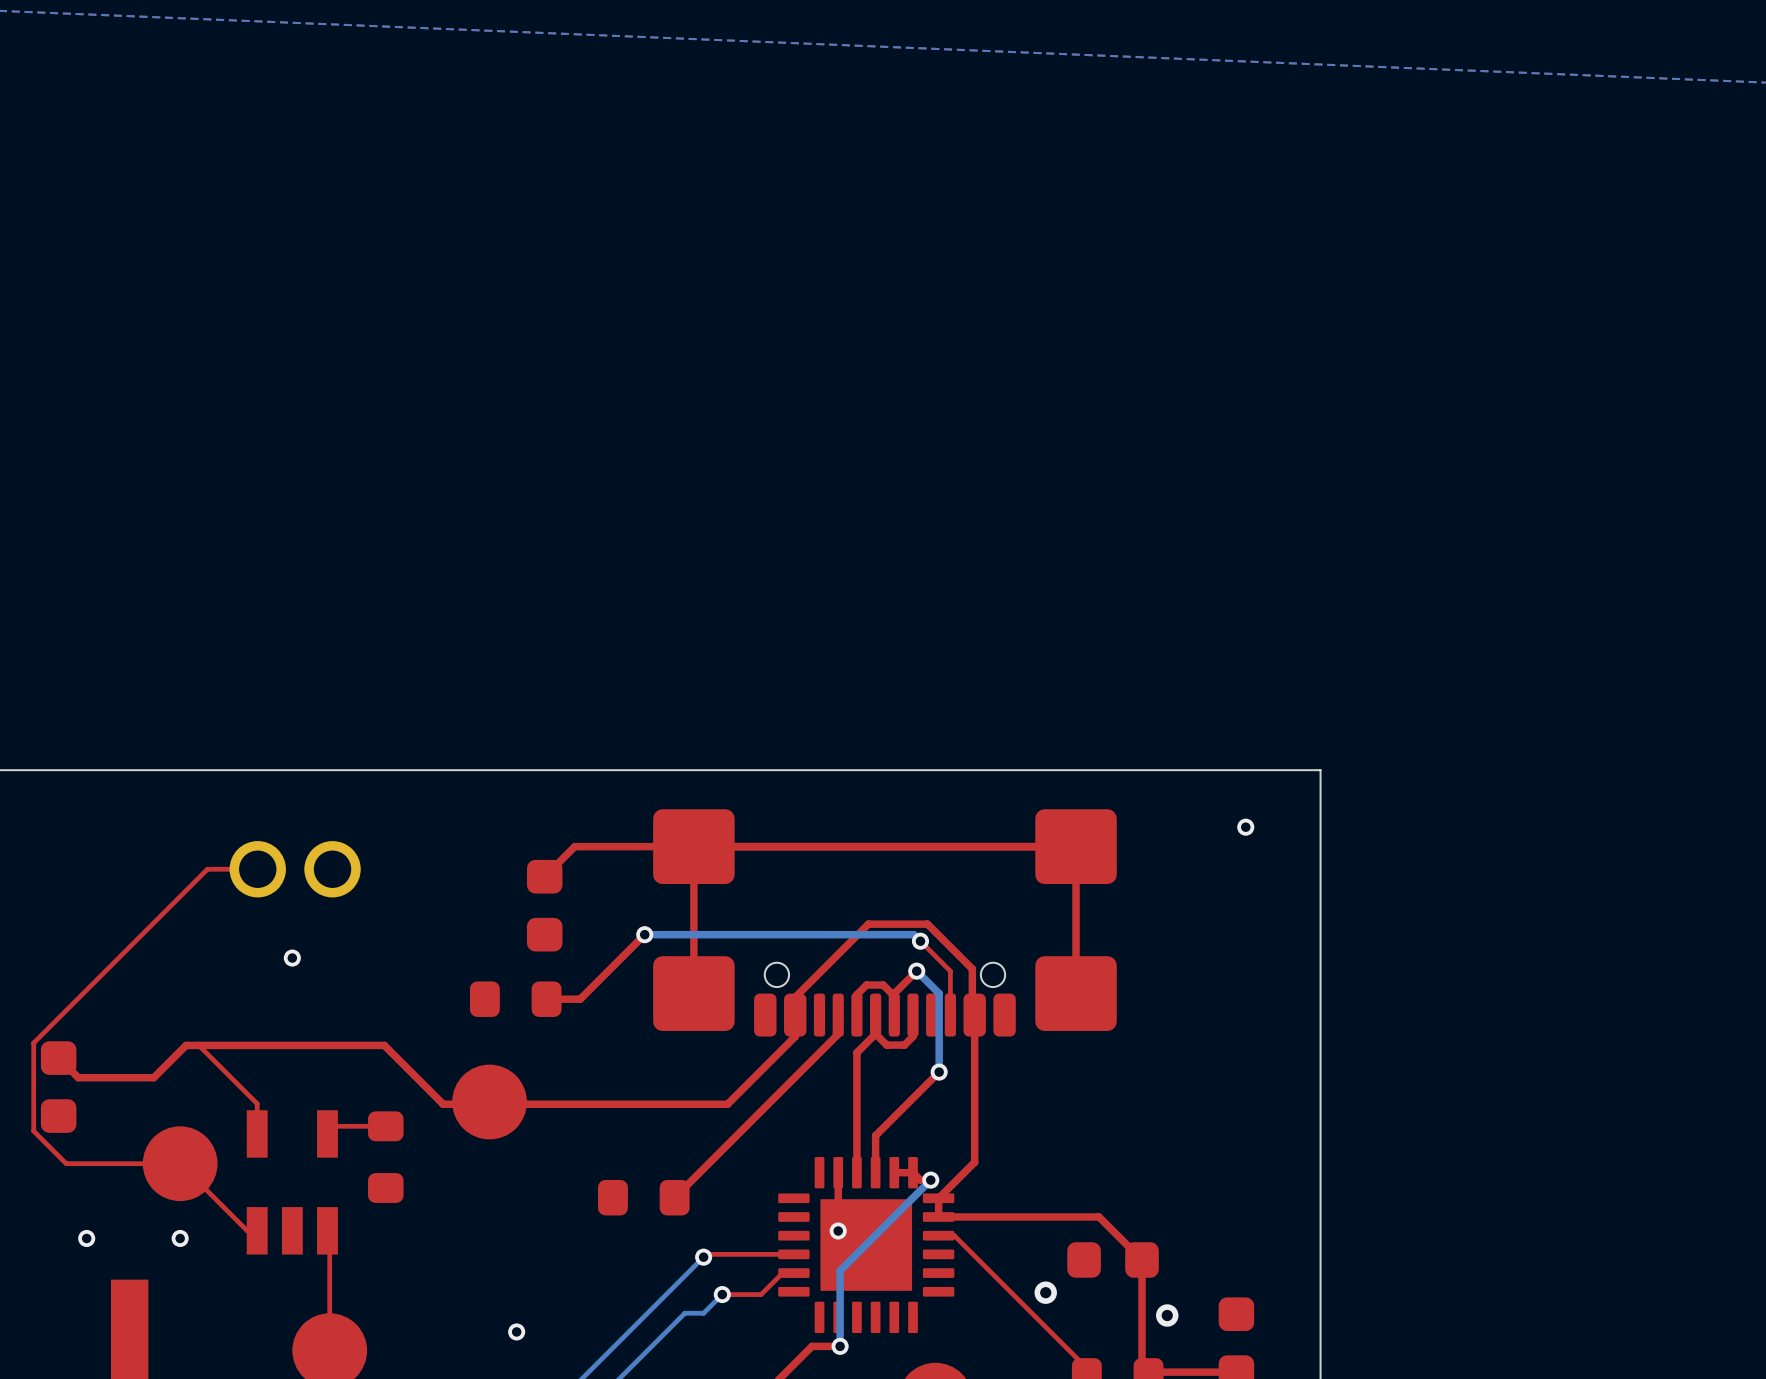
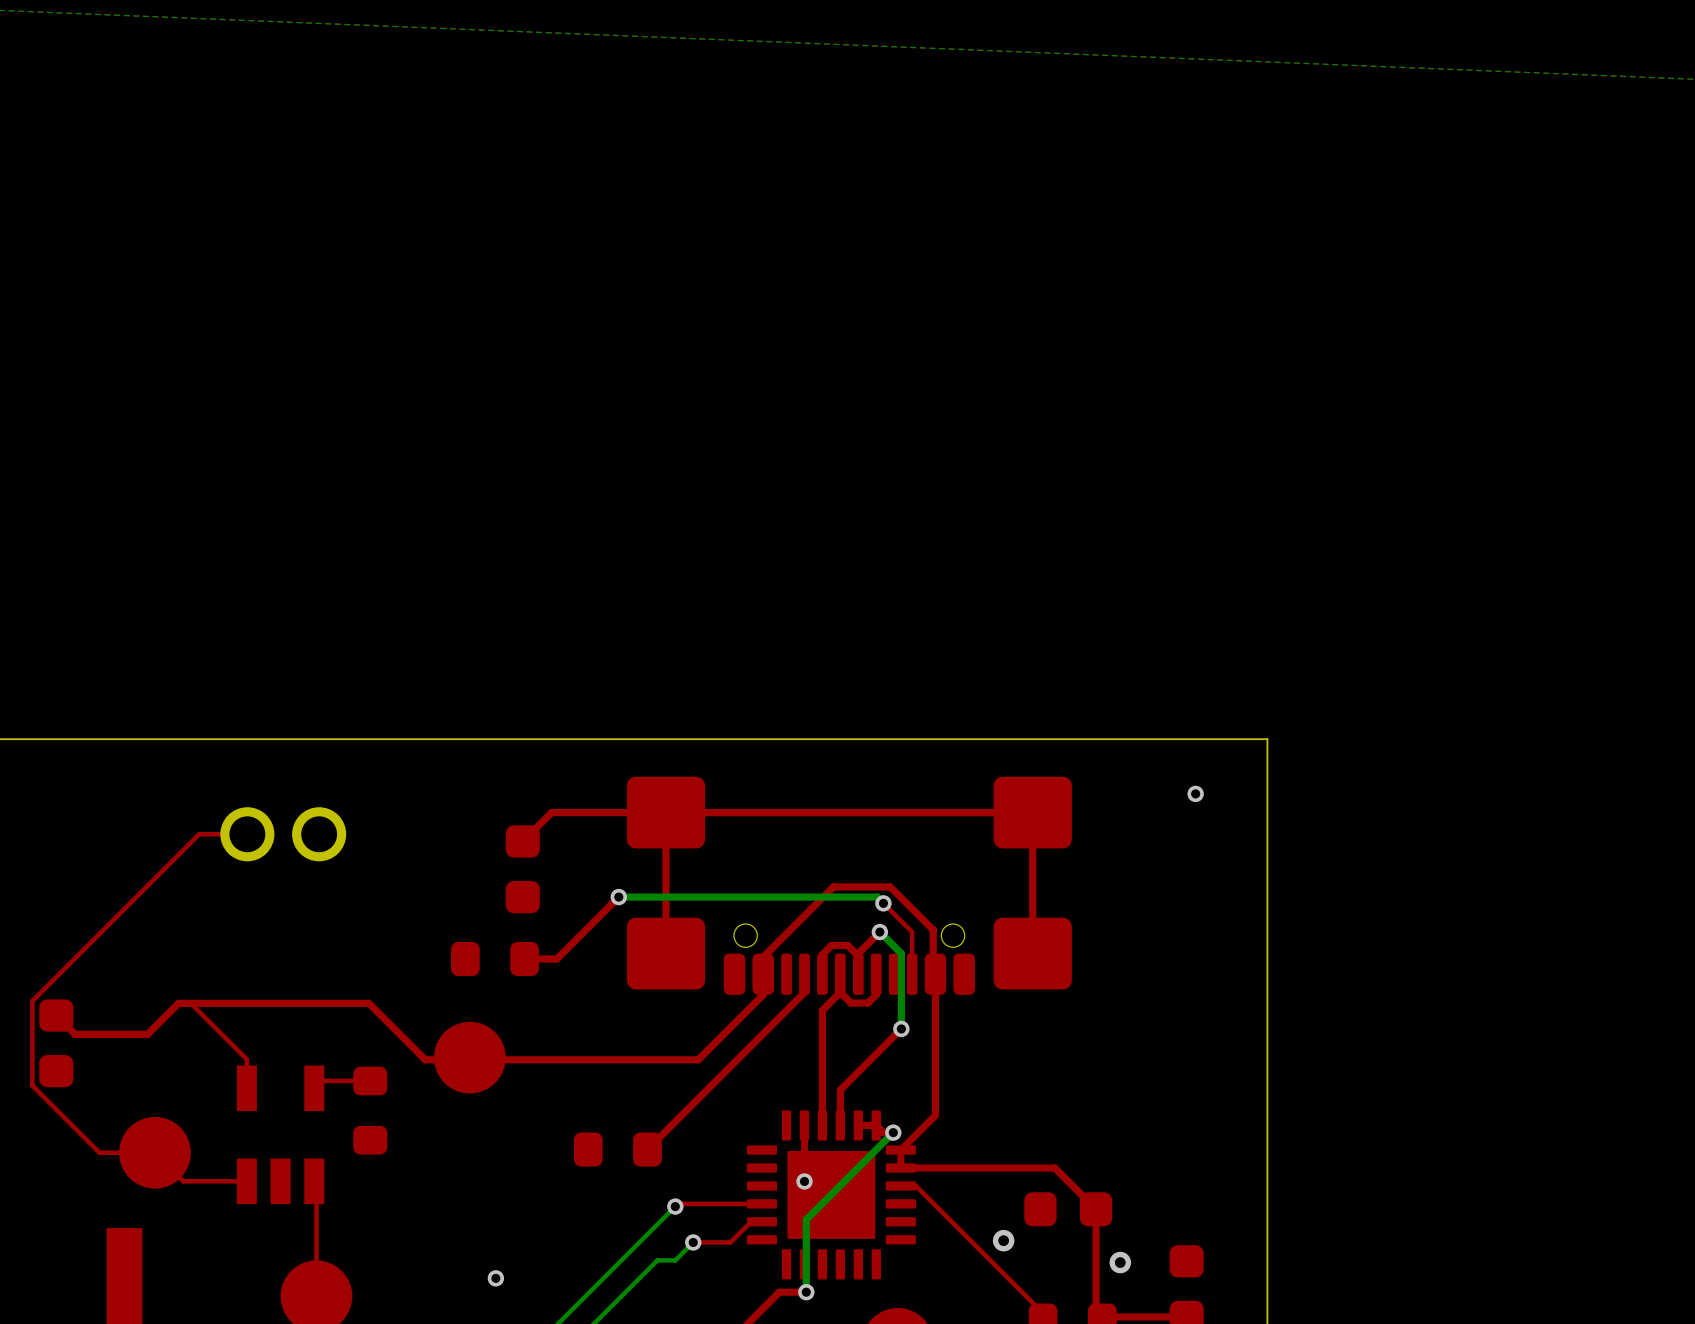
via: (292, 958) -> none
top track: (66, 1163) (180, 1163) (247, 1230) -> (63, 1116) (99, 1152) (154, 1152) (183, 1181) (237, 1181)
part position: (180, 1163) -> (154, 1152)
via: (86, 1238) -> none
via: (180, 1238) -> none

